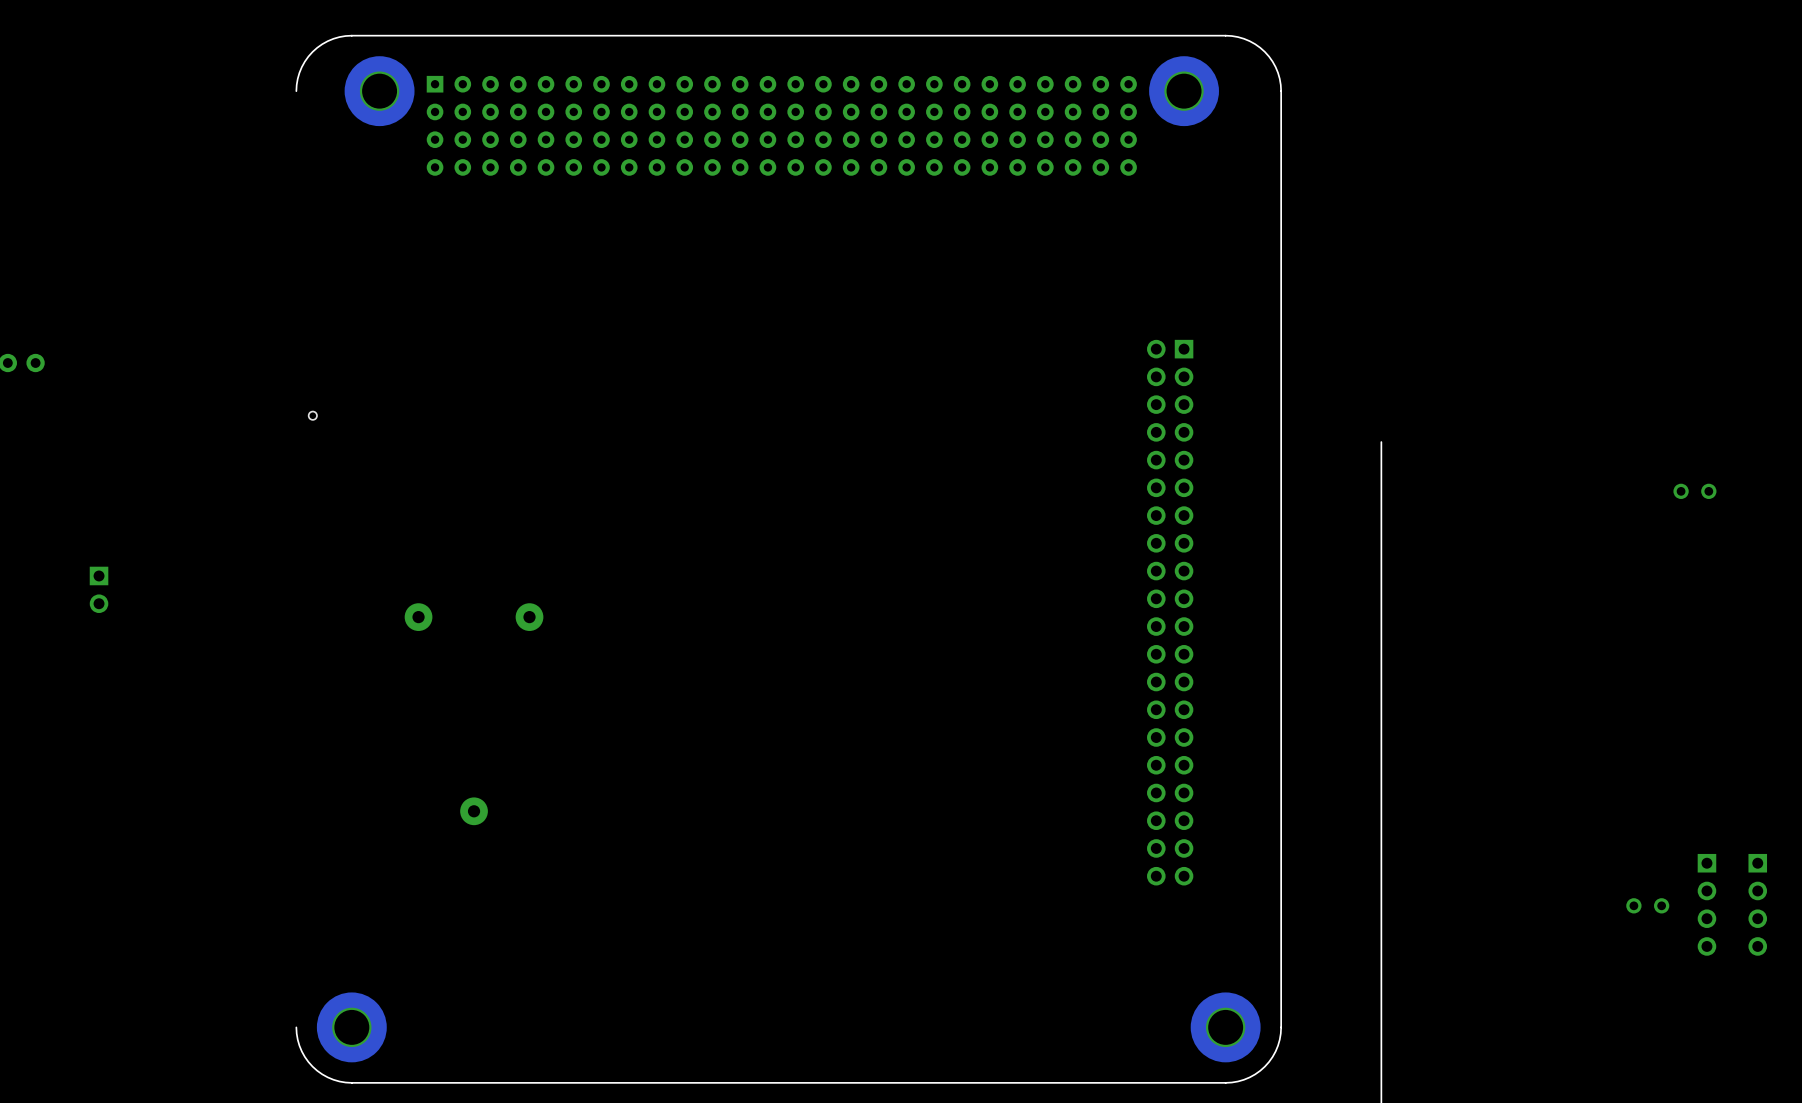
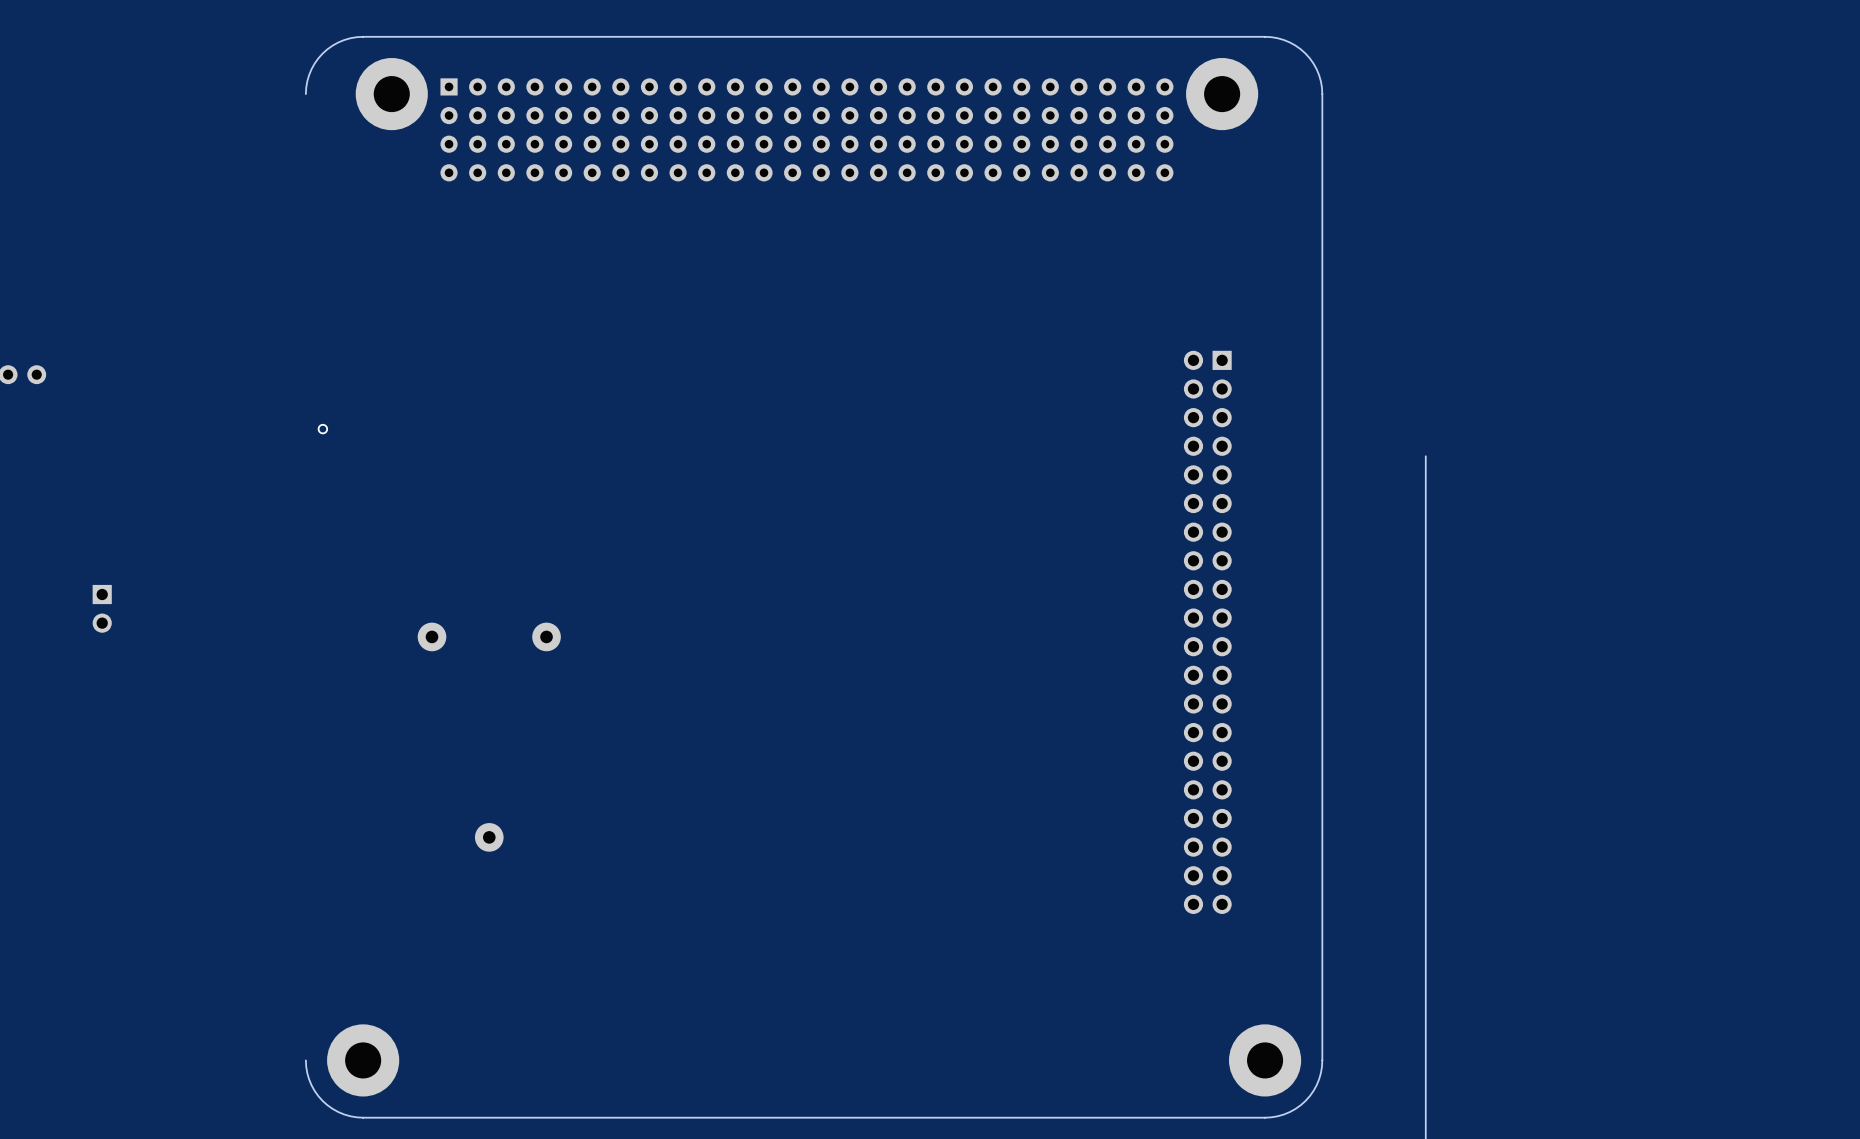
part: (1694, 491) -> none
part: (1706, 904) -> none
part: (1757, 904) -> none
part: (1647, 905) -> none

